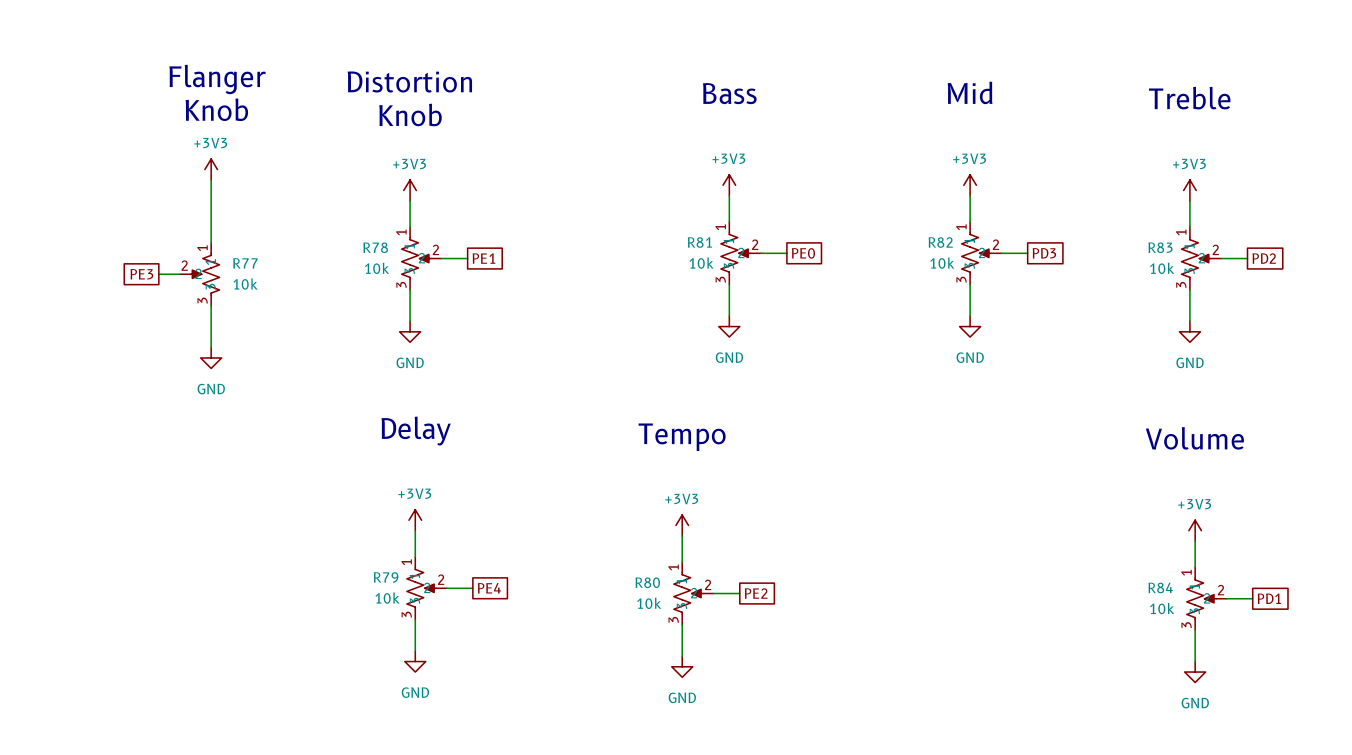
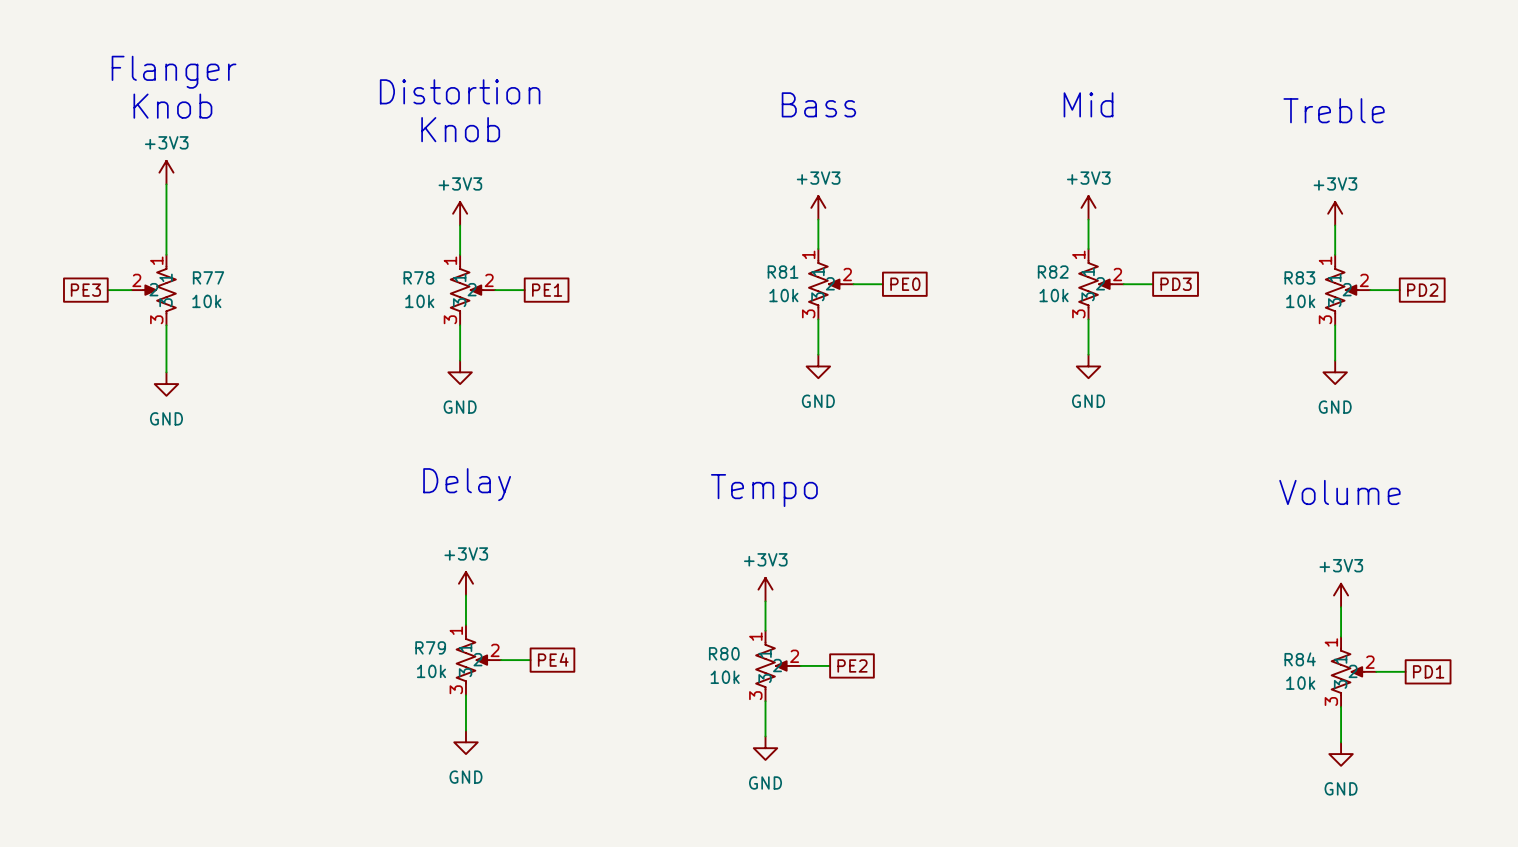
text position: Flanger (217, 79) -> Flanger (174, 72)
text position: Knob (216, 109) -> Knob (172, 106)
power symbol position: +3V3 (211, 169) -> +3V3 (166, 172)
wire: (211, 180) (211, 242) -> (166, 184) (166, 254)
global label position: PE3 (141, 274) -> PE3 (85, 290)
wire: (158, 274) (179, 274) -> (107, 290) (131, 290)
R77 position: (199, 274) -> (153, 290)
wire: (211, 305) (211, 347) -> (166, 325) (166, 372)
power symbol position: GND (211, 357) -> GND (166, 384)

